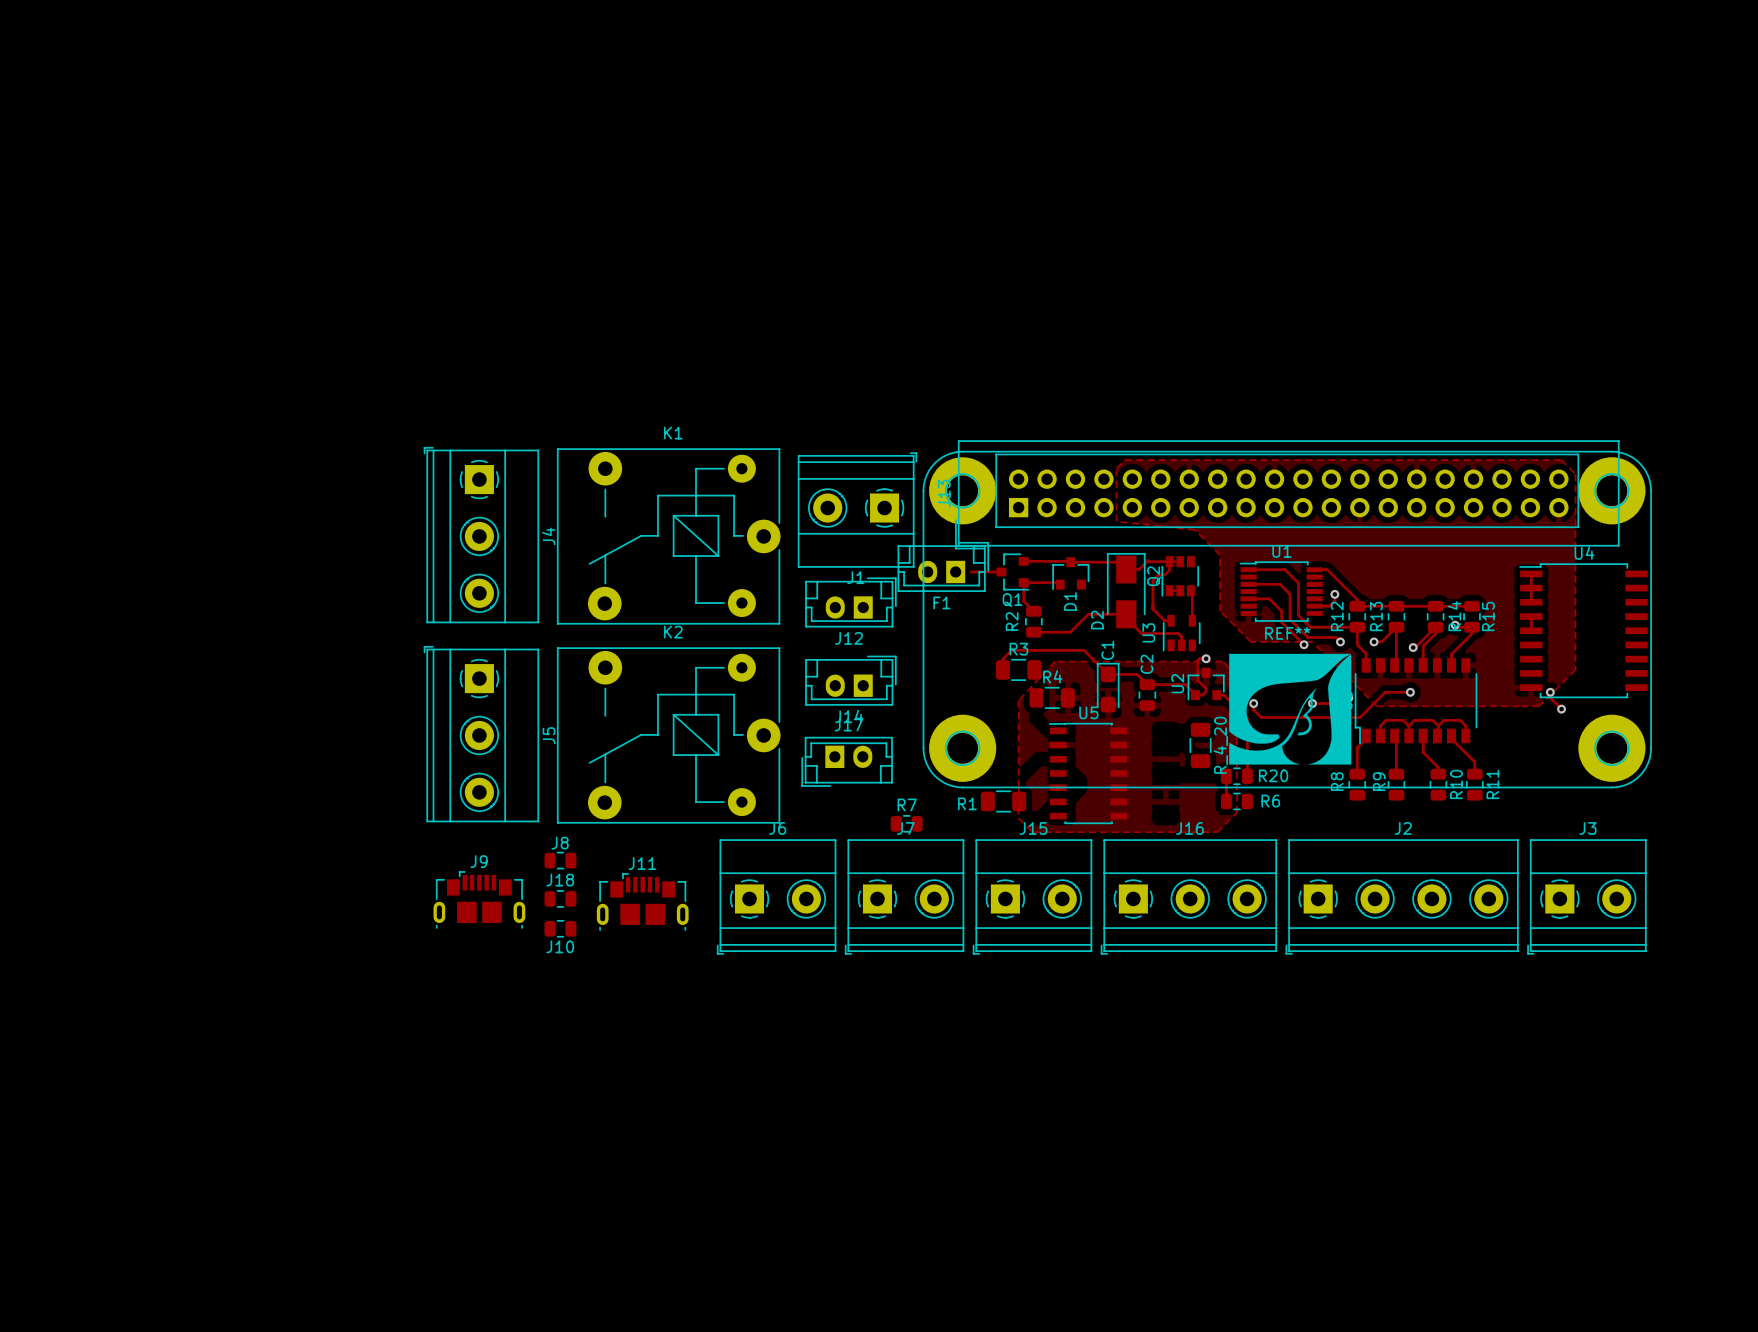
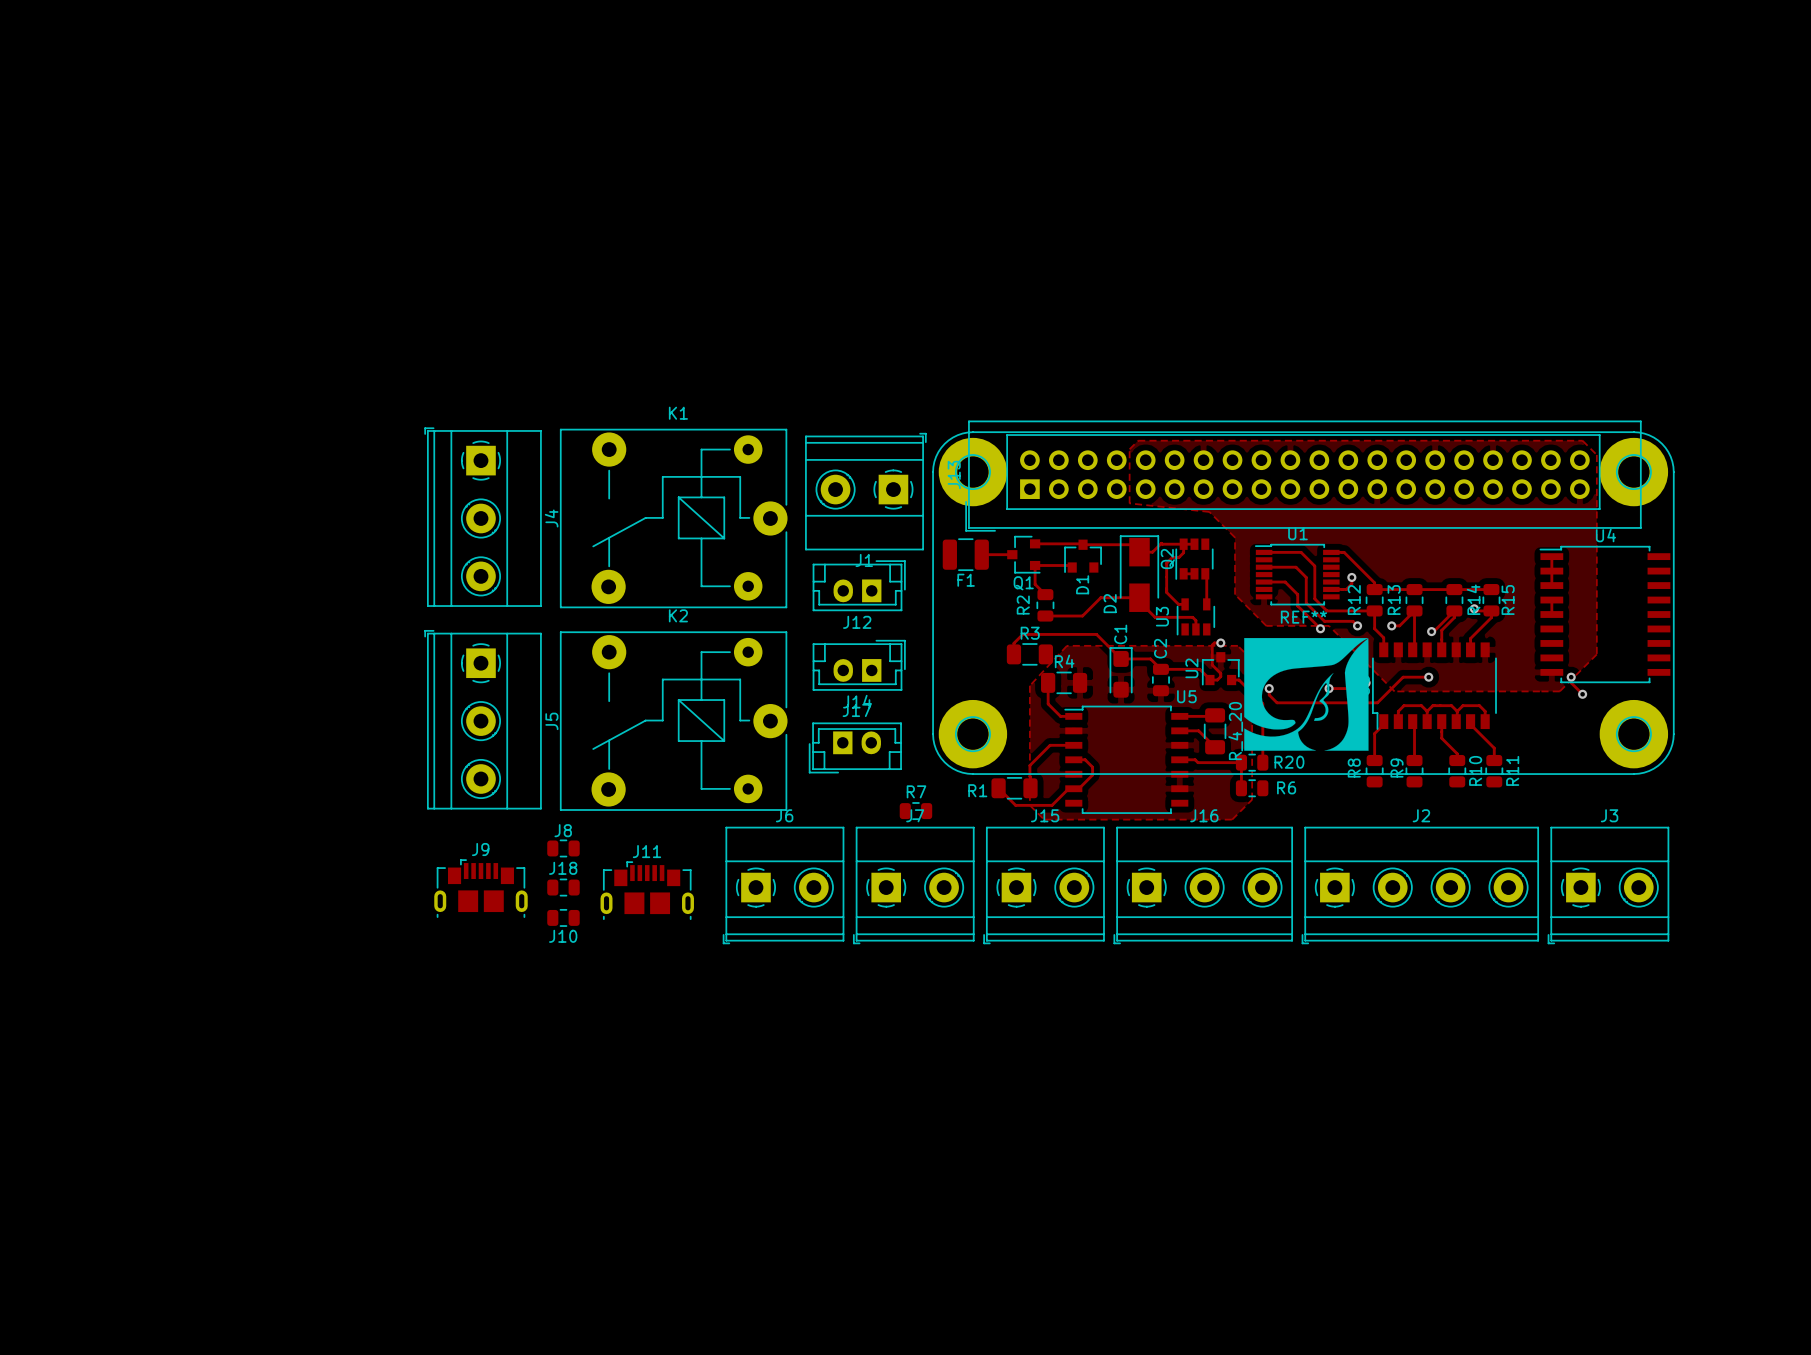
F1 footprint: [897, 542, 989, 592] -> [942, 538, 989, 571]
track: none -> (1048, 682) (1048, 703) (1060, 716) (1073, 716)
U5 name position: U5 (1088, 712) -> U5 (1186, 696)
U5 footprint: [1049, 722, 1128, 825] -> [1064, 705, 1189, 814]
track: none -> (1215, 715) (1179, 716)
track: none -> (1179, 730) (1198, 730) (1215, 747)
track: none -> (1073, 745) (1050, 745) (1029, 765) (1030, 788)
track: none -> (1073, 759) (1085, 759) (1092, 767) (1092, 775) (1078, 788) (1068, 788) (1052, 805) (1015, 805) (998, 788)
track: none -> (1179, 759) (1195, 759) (1198, 762) (1241, 762)

